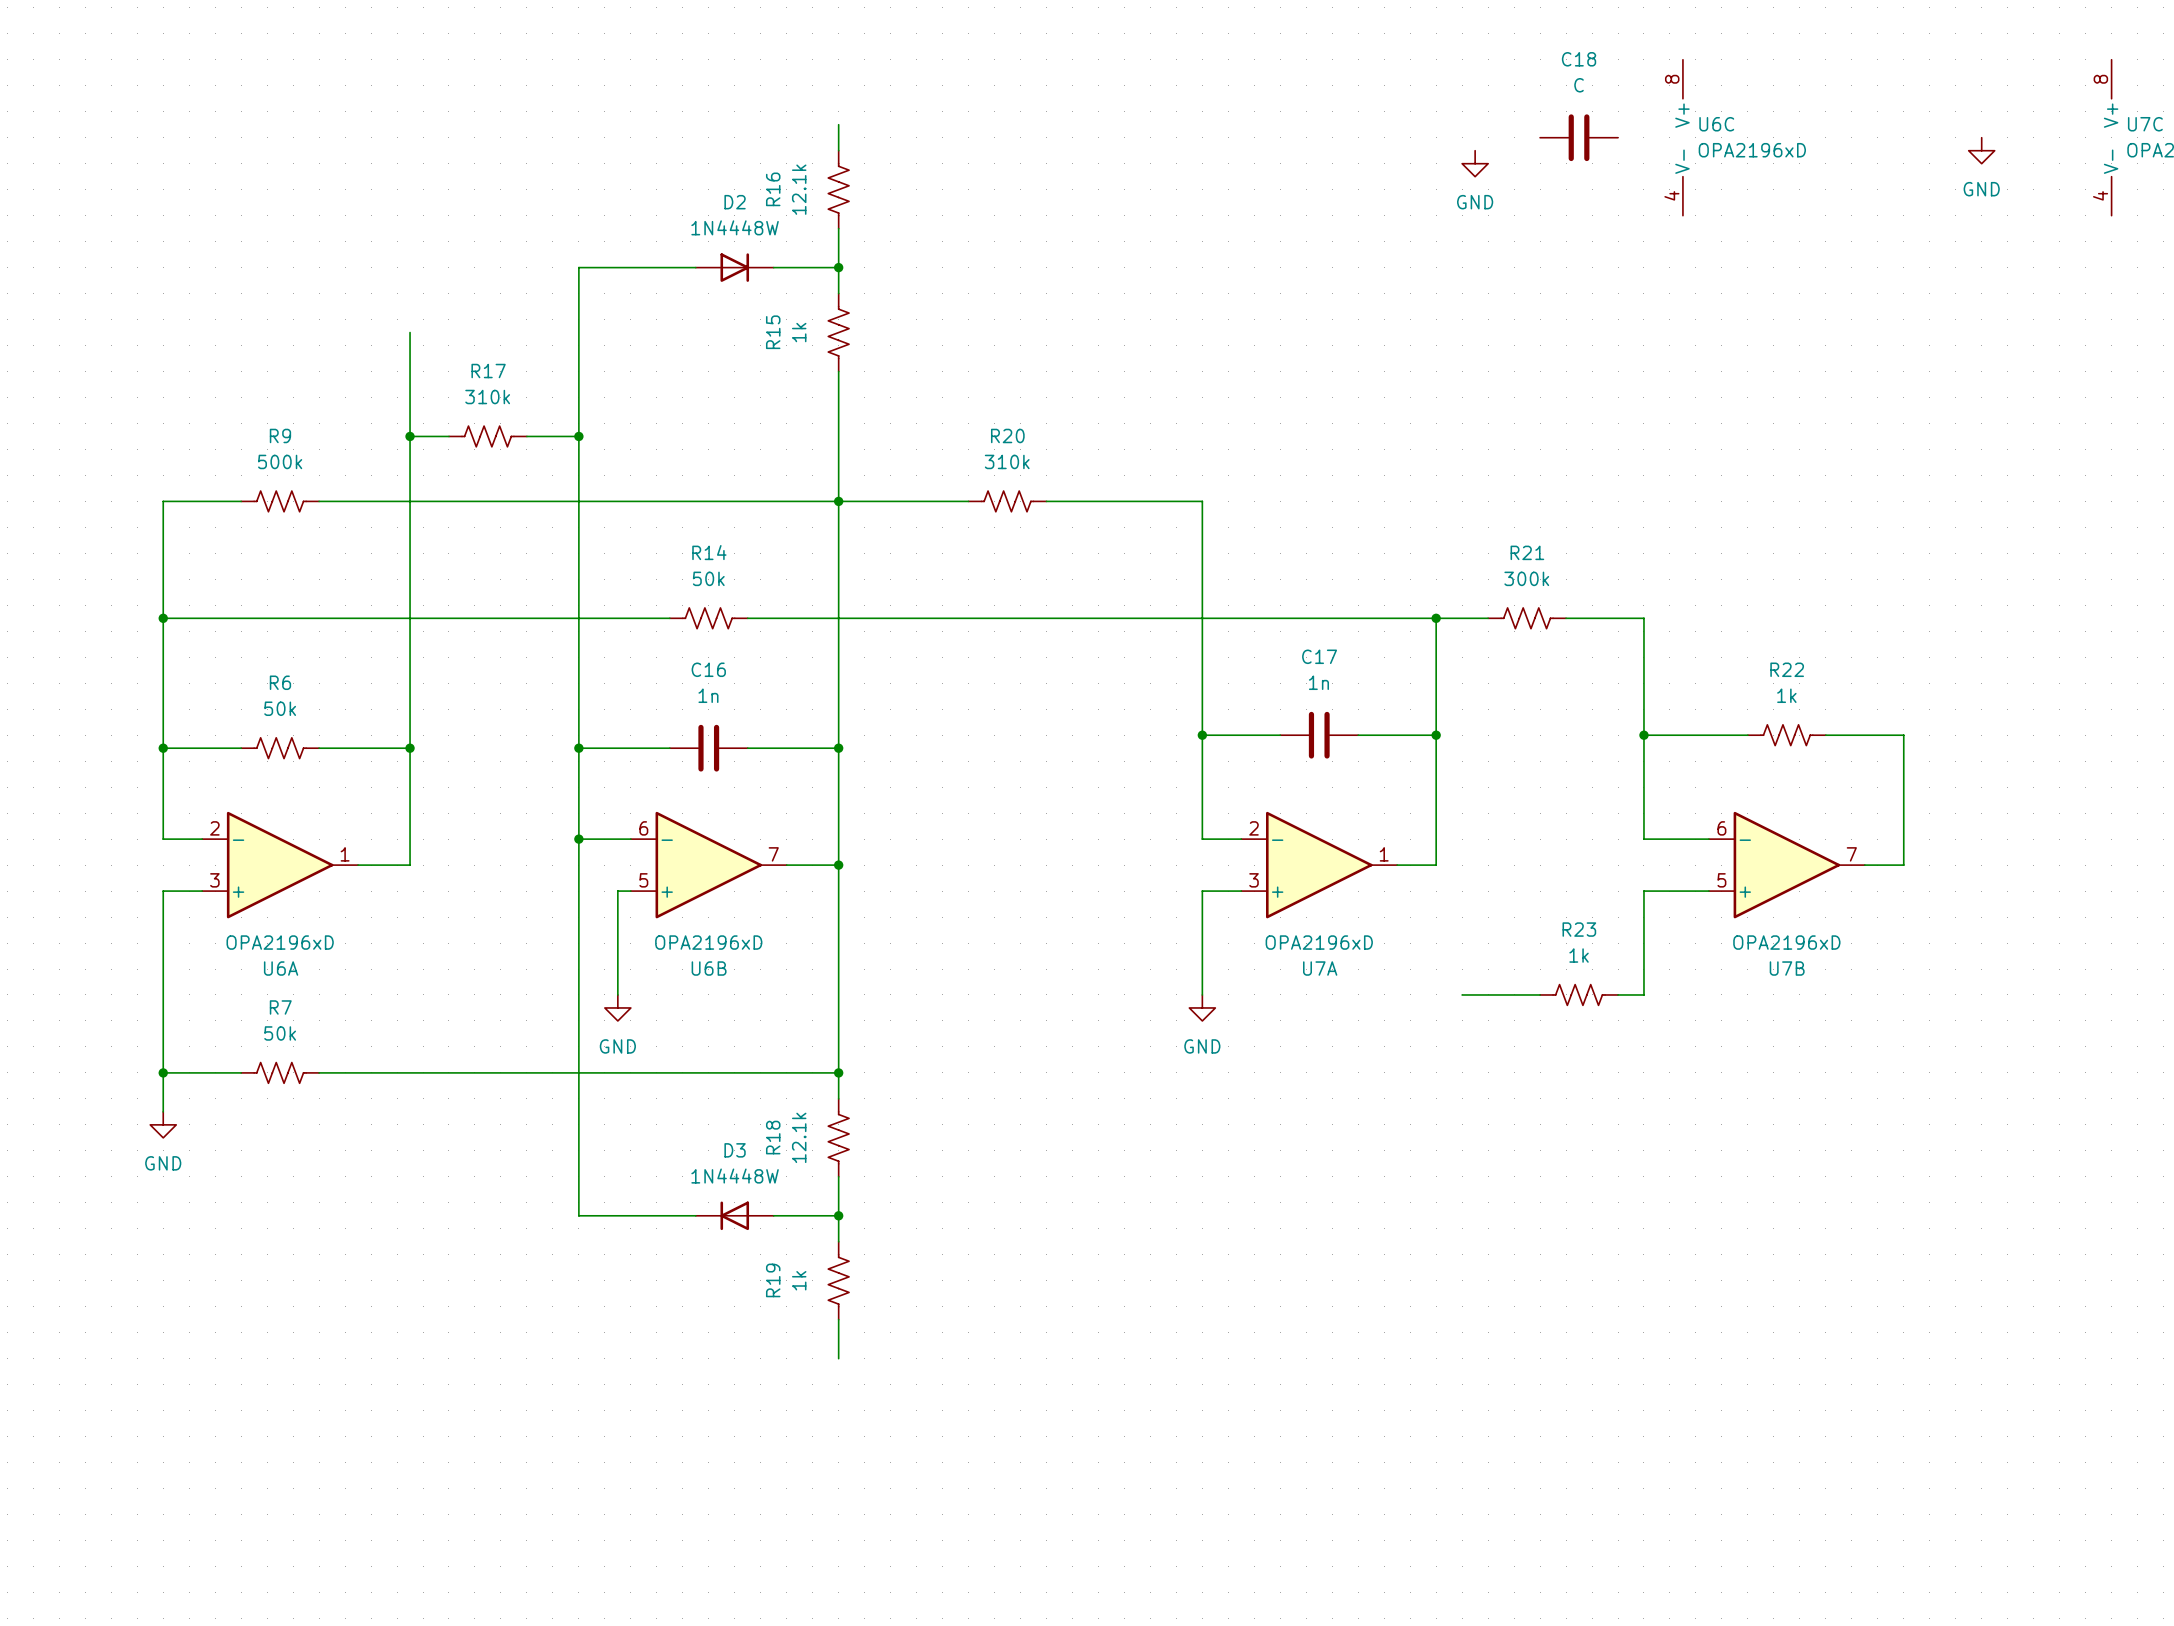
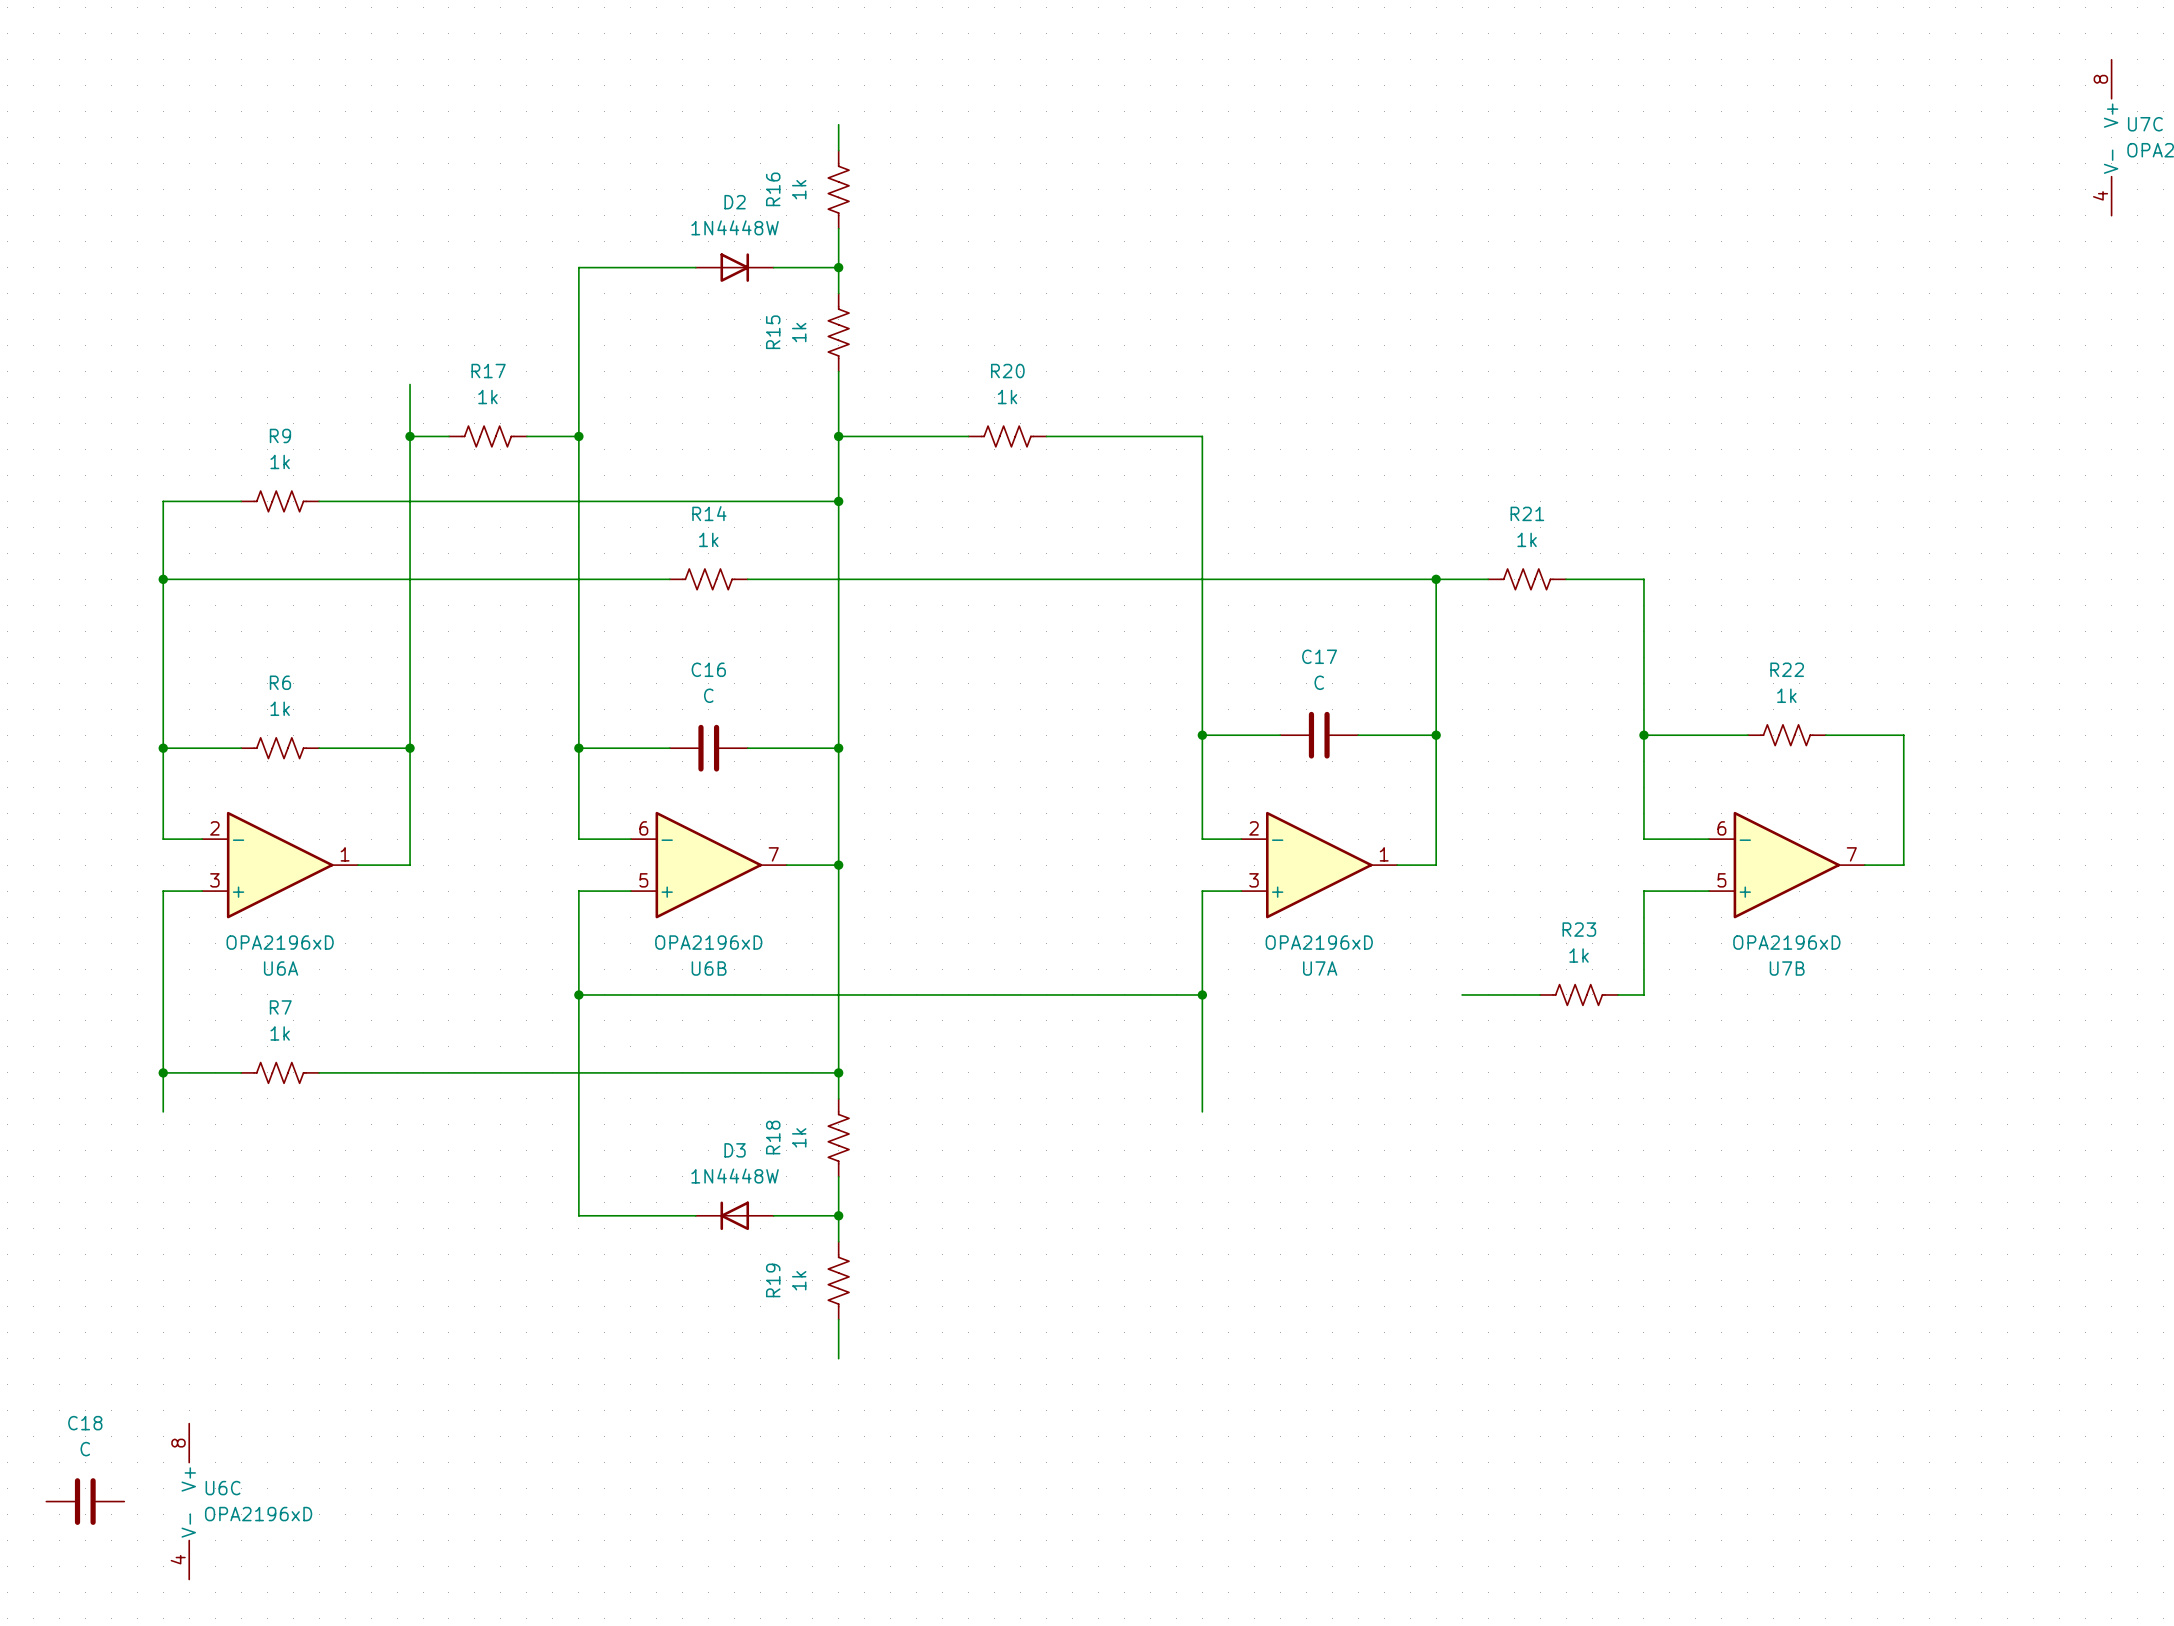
C18 position: (1579, 137) -> (85, 1501)
U6C position: (1682, 137) -> (189, 1501)
power symbol: GND (1981, 150) -> none
power symbol: GND (1475, 163) -> none
R16 value: 12.1k (799, 189) -> 1k (799, 189)
wire: (410, 332) (410, 384) -> none
R17 value: 310k (487, 397) -> 1k (487, 397)
junction: none -> (838, 436)
R9 value: 500k (280, 461) -> 1k (280, 461)
R20 value: 310k (1007, 461) -> 1k (1007, 397)
wire: (838, 501) (968, 501) -> (838, 436) (968, 436)
R20 position: (1007, 501) -> (1007, 436)
wire: (1046, 501) (1202, 501) -> (1046, 436) (1202, 436) (1202, 501)
R14 value: 50k (708, 578) -> 1k (708, 539)
R21 value: 300k (1526, 578) -> 1k (1527, 539)
wire: none -> (1436, 579) (1436, 618)
wire: (163, 618) (669, 618) -> (163, 579) (669, 579)
junction position: (163, 618) -> (163, 579)
R14 position: (708, 618) -> (708, 579)
wire: (747, 618) (1488, 618) -> (747, 579) (1488, 579)
junction position: (1436, 618) -> (1436, 579)
R21 position: (1527, 618) -> (1527, 579)
wire: (1566, 618) (1643, 618) -> (1566, 579) (1643, 579) (1643, 618)
C17 value: 1n (1318, 682) -> C (1319, 682)
C16 value: 1n (708, 695) -> C (708, 695)
R6 value: 50k (280, 708) -> 1k (280, 708)
wire: (578, 839) (578, 891) -> (617, 891) (578, 891)
junction: (578, 839) -> none
wire: (617, 891) (617, 994) -> none
wire: none -> (578, 994) (1202, 994) (1202, 1111)
junction: none -> (578, 994)
junction: none -> (1202, 994)
power symbol: GND (617, 1007) -> none
power symbol: GND (1202, 1007) -> none
R7 value: 50k (280, 1033) -> 1k (280, 1033)
power symbol: GND (163, 1124) -> none
R18 value: 12.1k (799, 1137) -> 1k (799, 1137)

